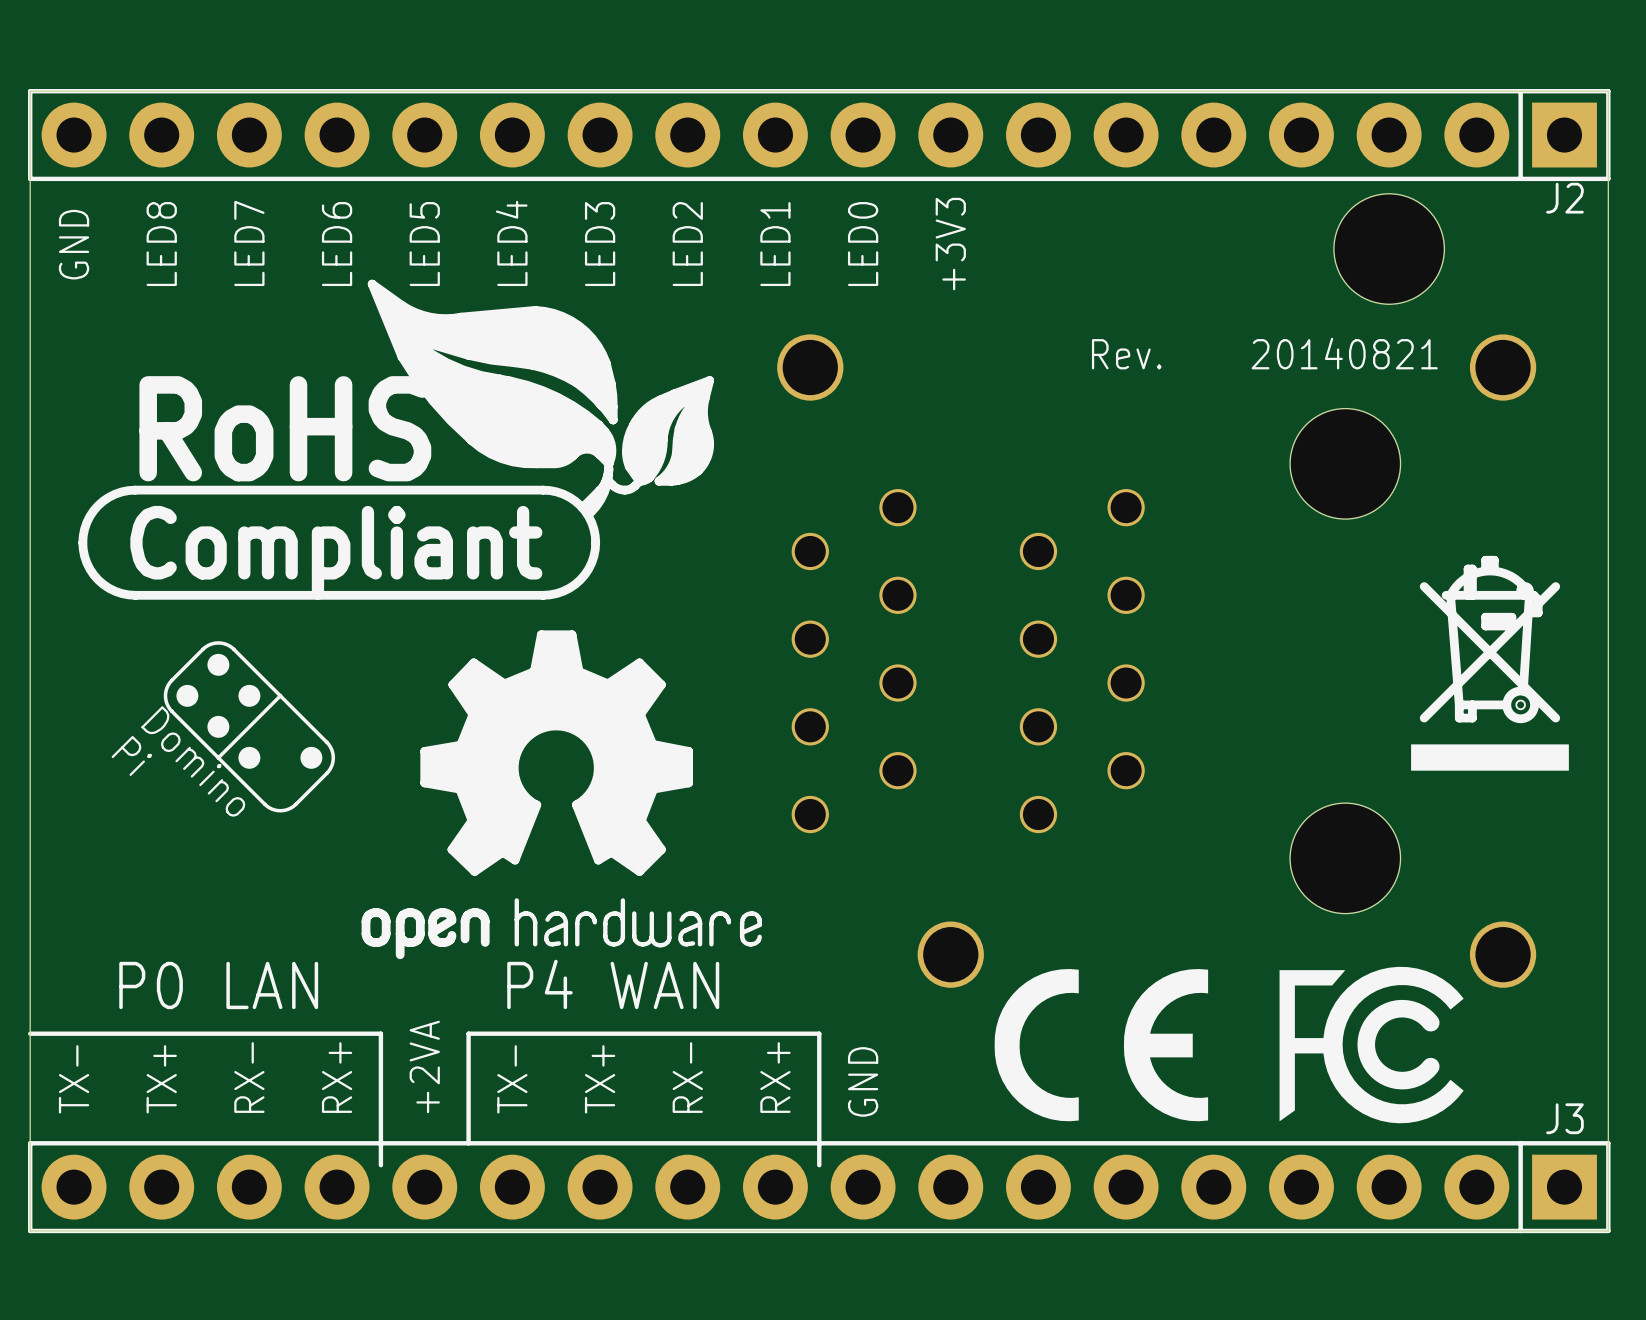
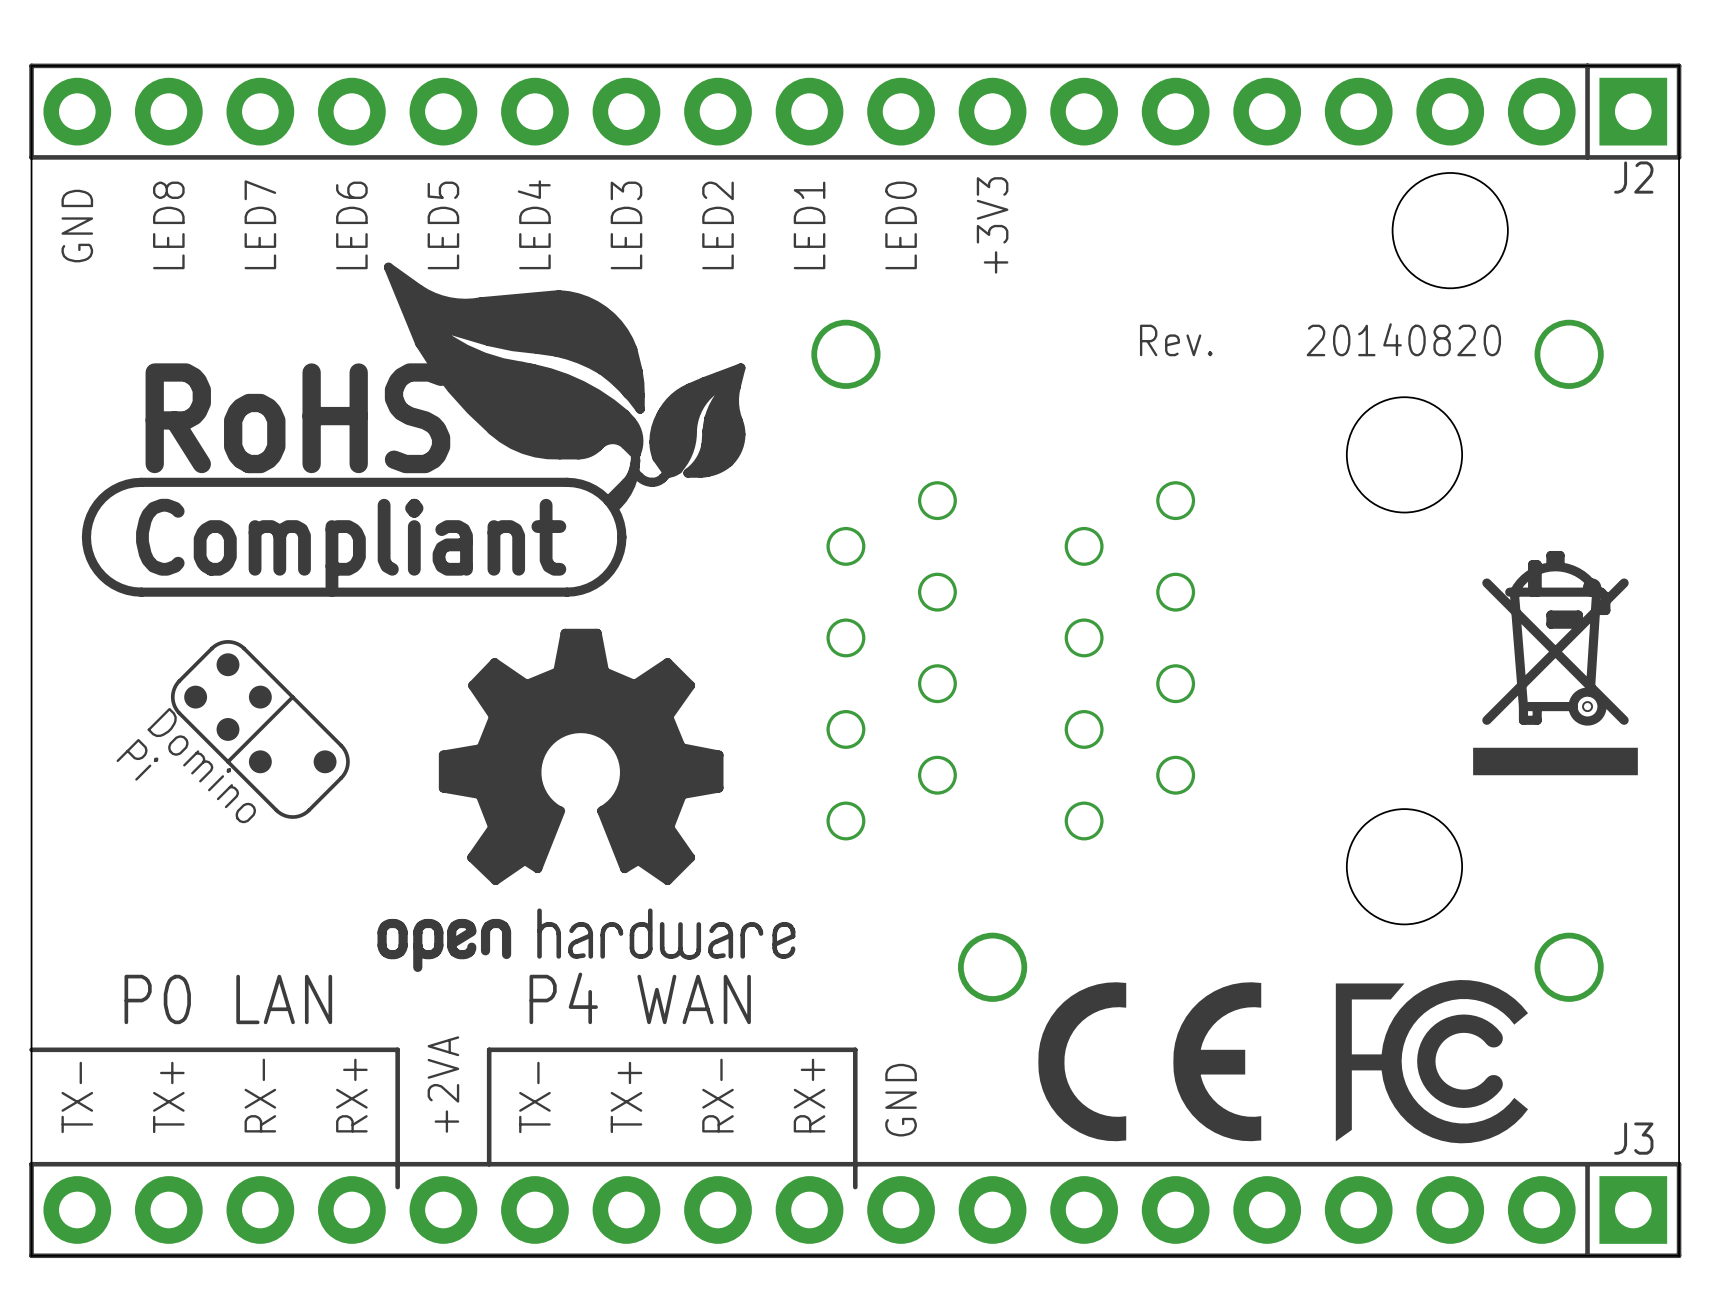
text: 20140821 (1344, 353) -> 20140820 (1403, 339)

